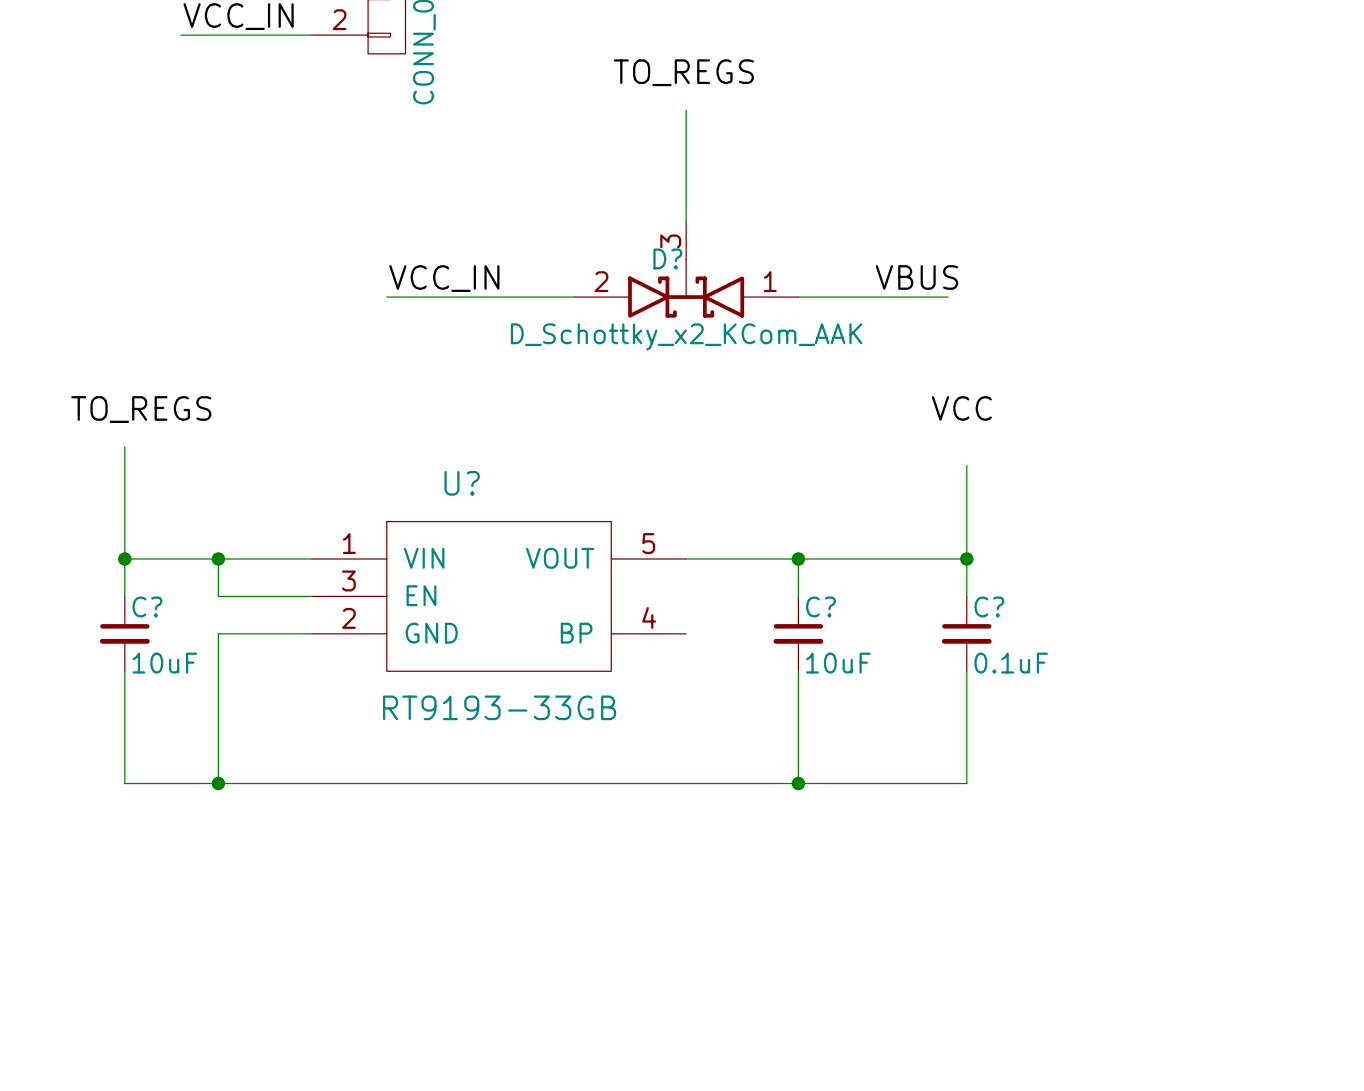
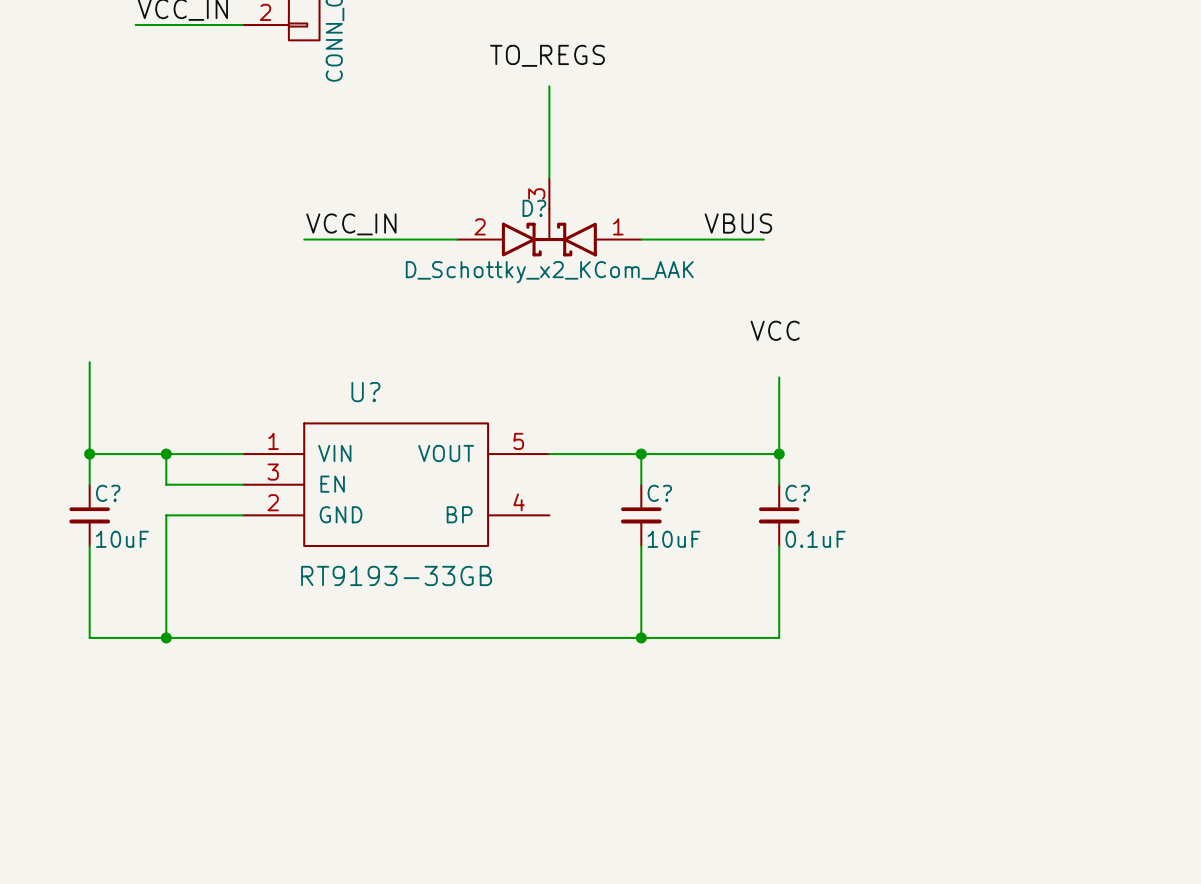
label: TO_REGS (141, 409) -> none

